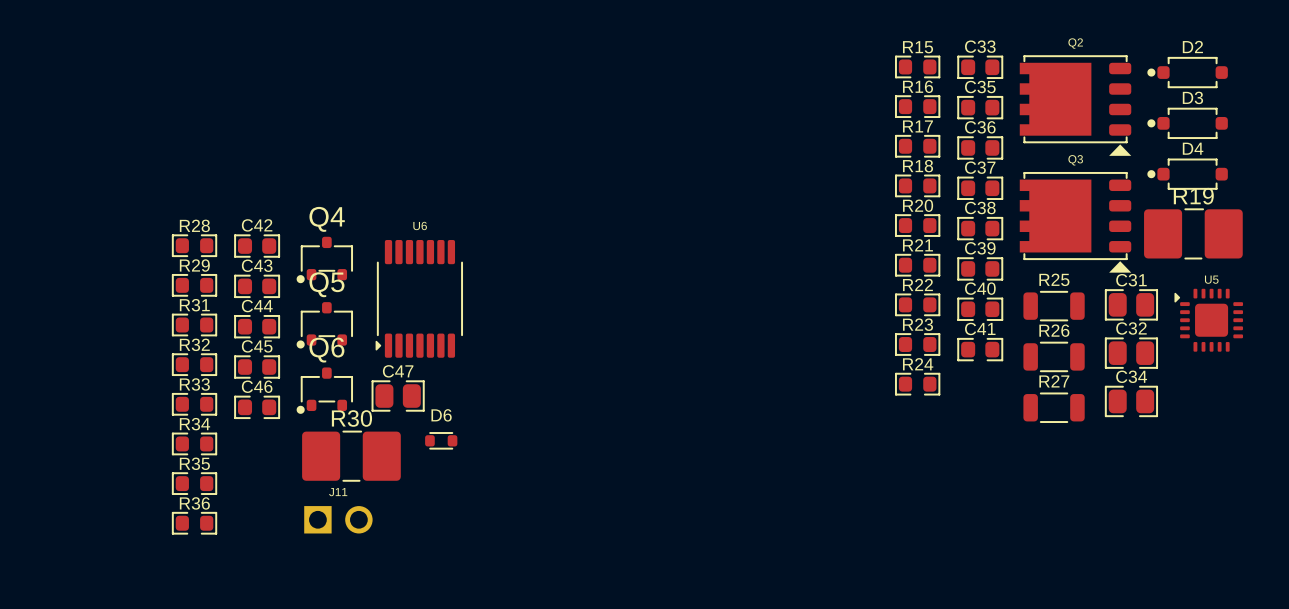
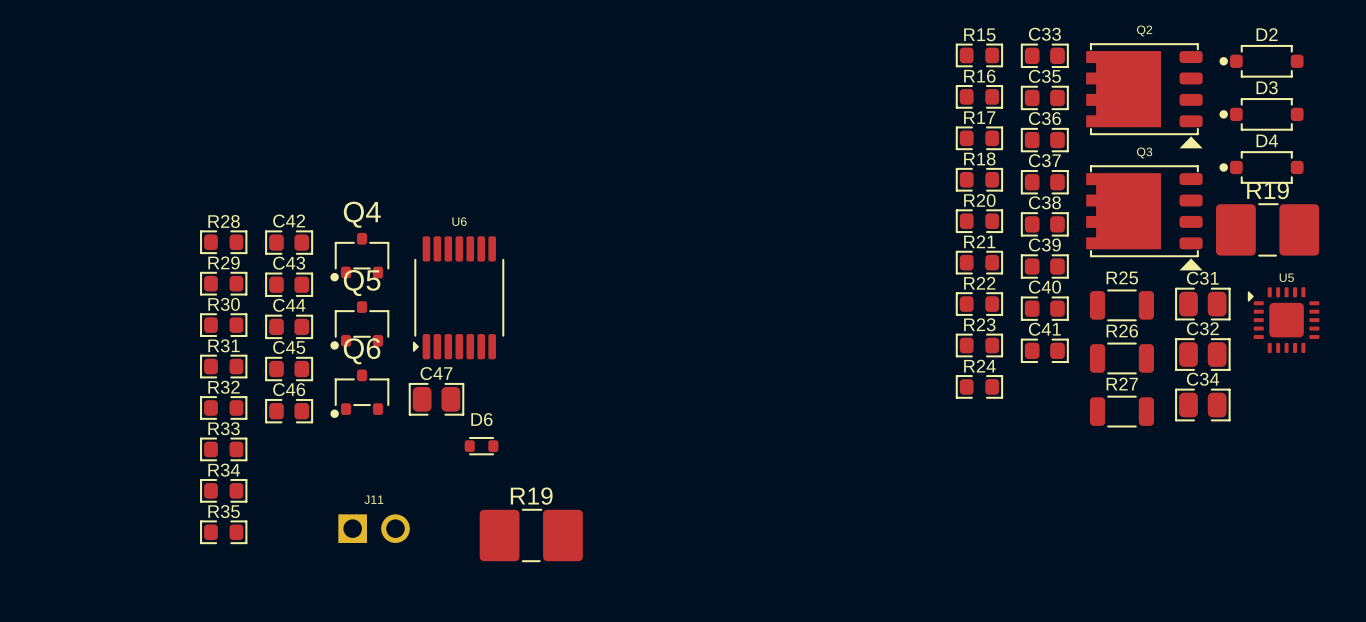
R31 name: R31 (194, 305) -> R30 (224, 304)
R32 name: R32 (194, 344) -> R31 (224, 345)
R33 name: R33 (194, 384) -> R32 (224, 387)
R34 name: R34 (194, 424) -> R33 (224, 428)
R30: (351, 456) -> none
R35 name: R35 (194, 463) -> R34 (224, 470)
R36 name: R36 (194, 503) -> R35 (224, 511)
R19: none -> (531, 535)

